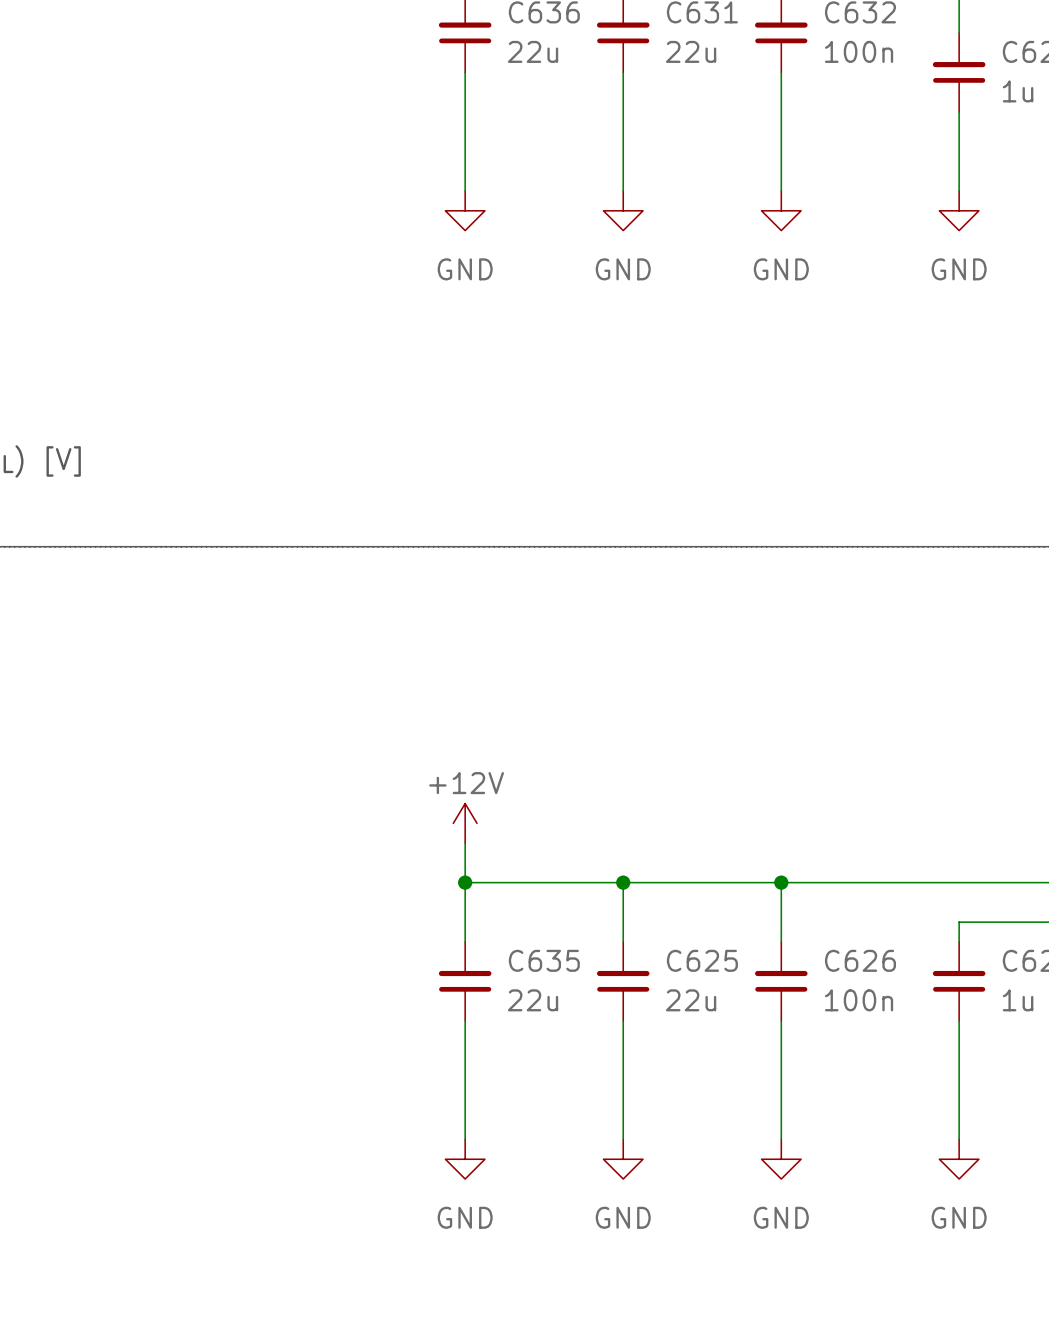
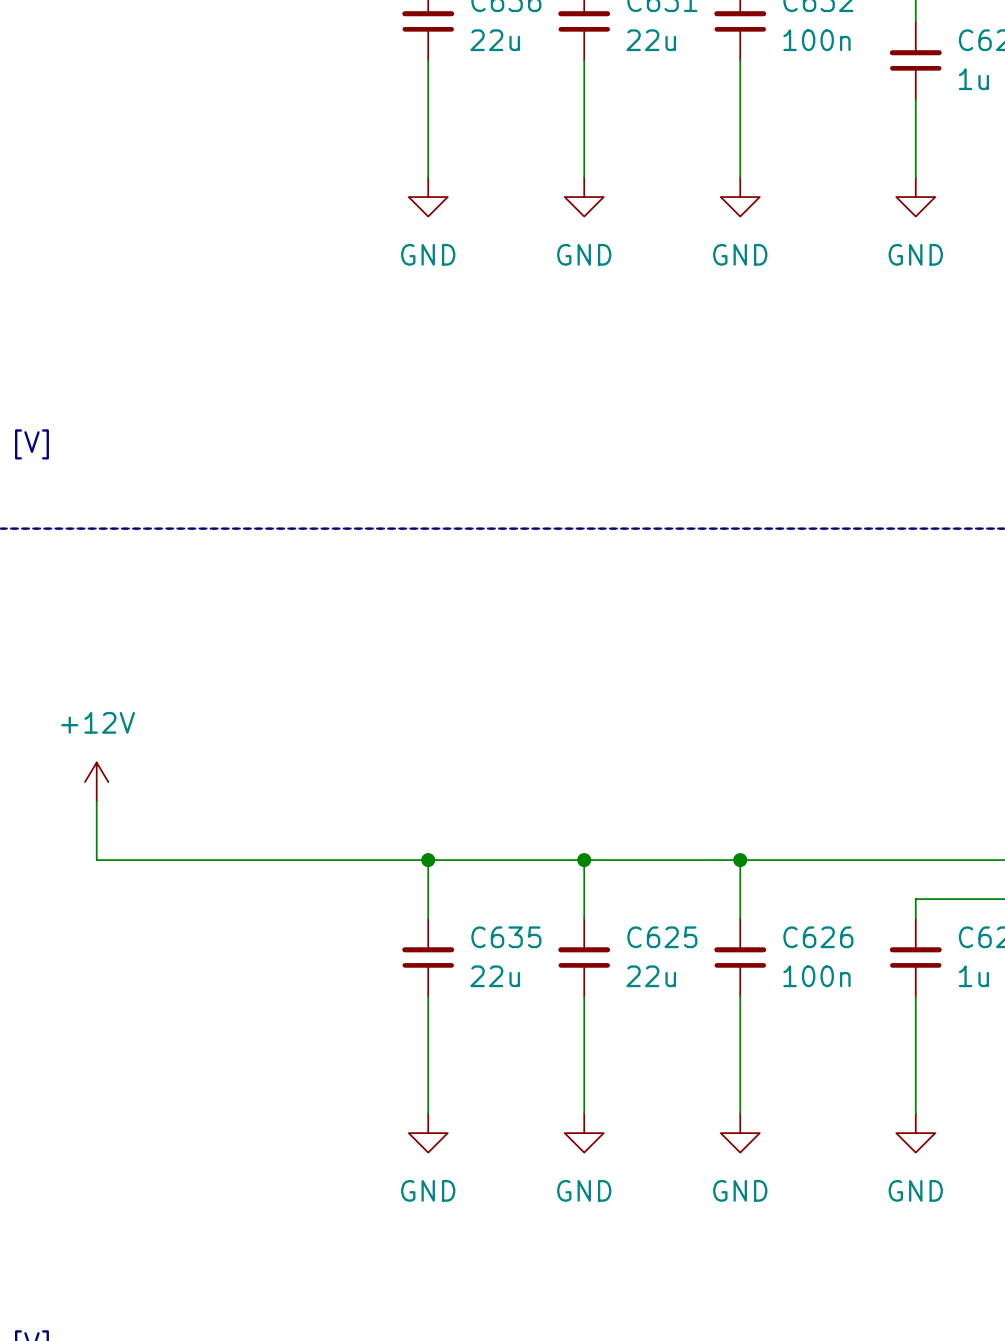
power symbol text position: +12V (466, 783) -> +12V (98, 722)
power symbol position: +12V (465, 823) -> +12V (96, 782)
wire: (465, 843) (465, 882) -> (96, 801) (96, 860) (428, 860)

